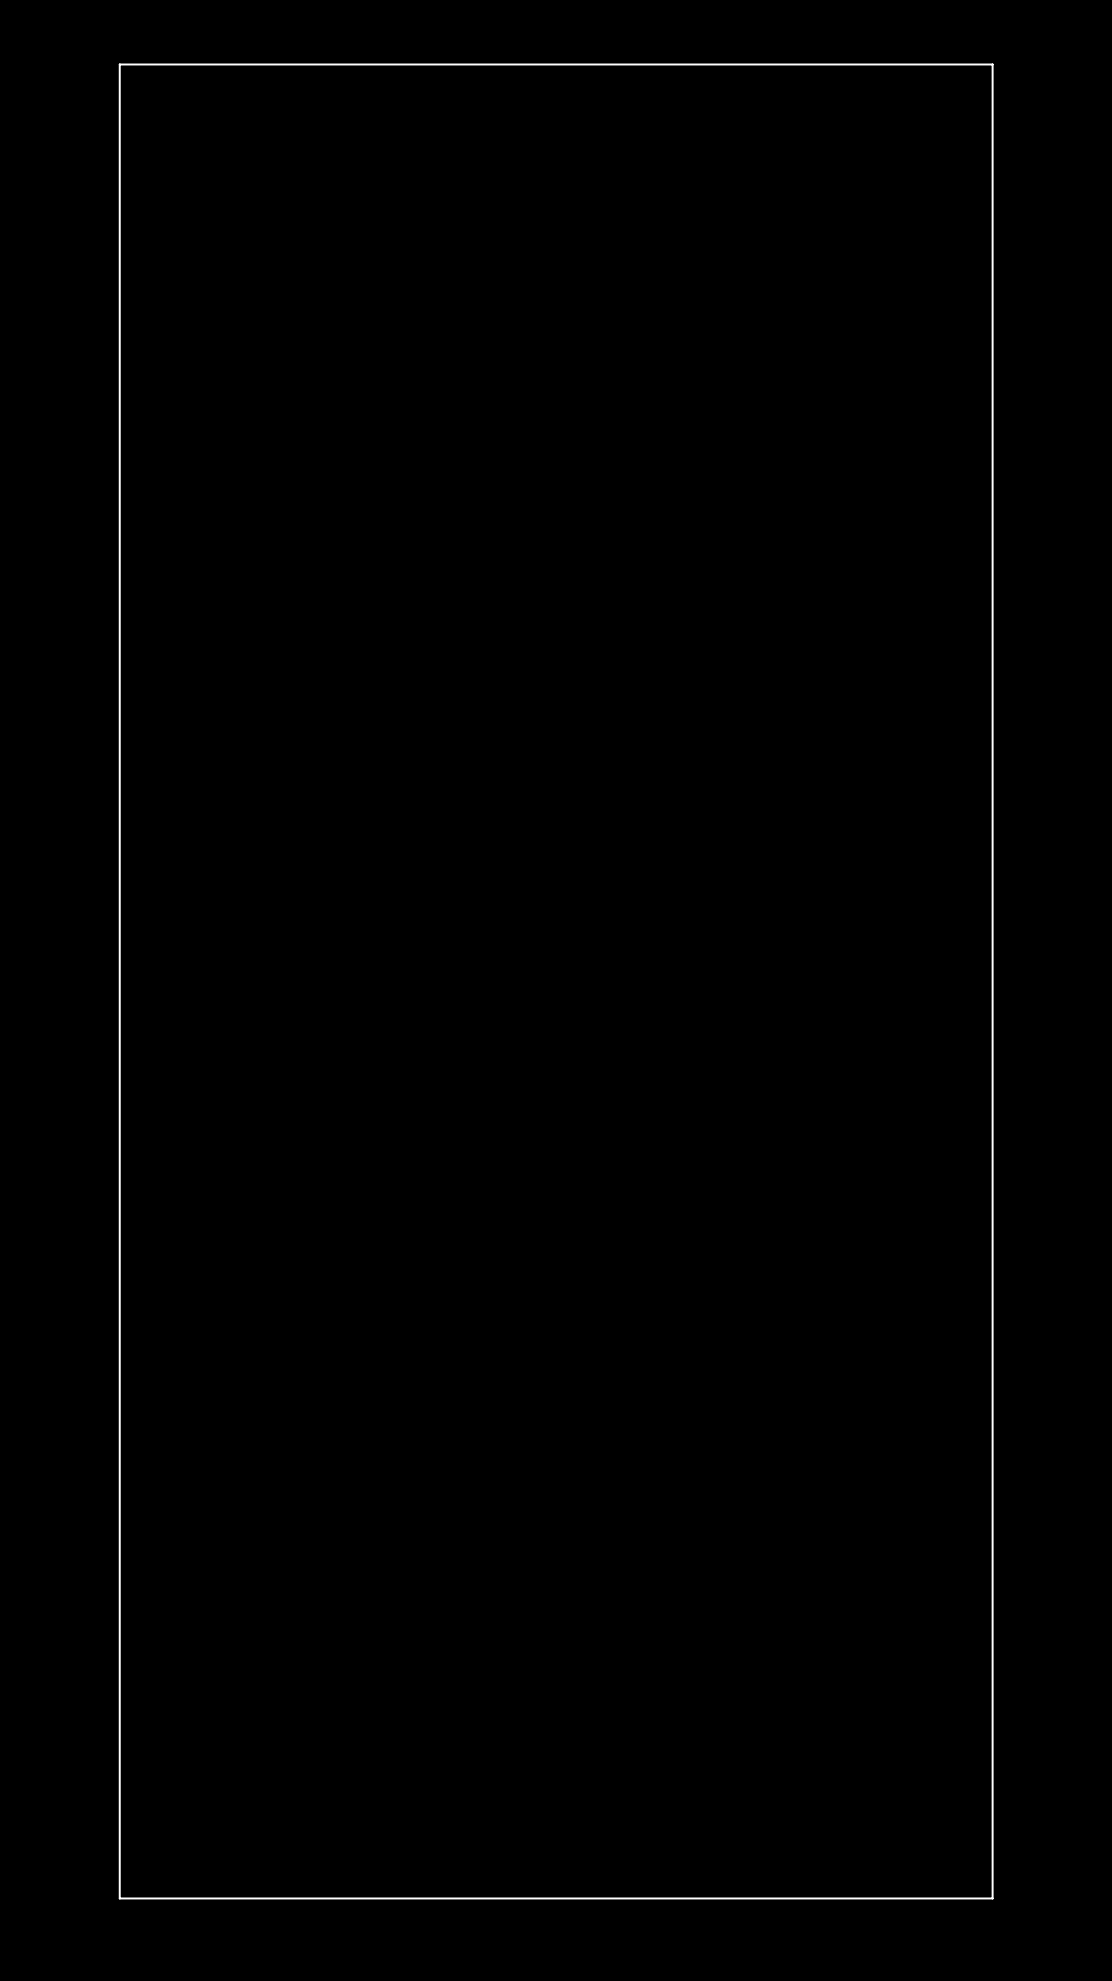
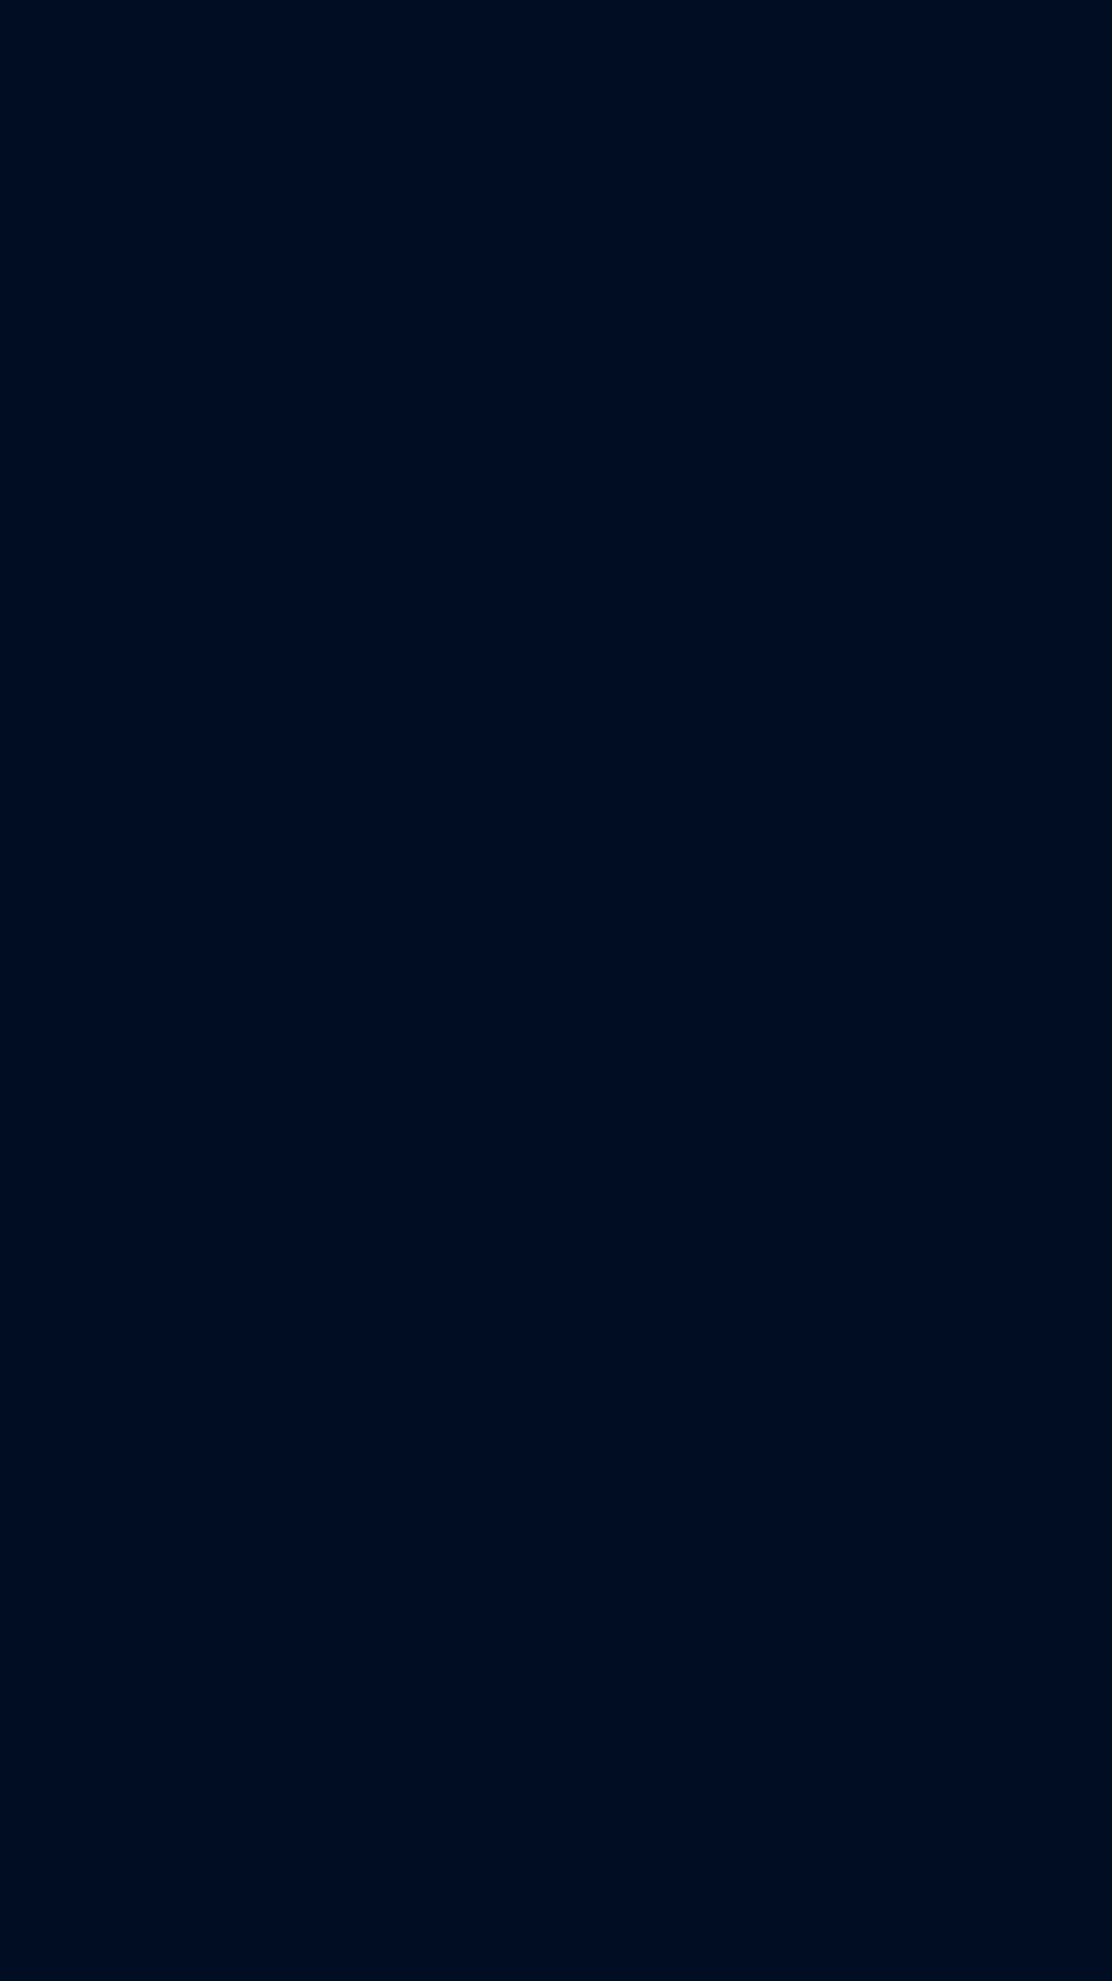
board edge: (119, 64) (992, 64) (992, 1898) (119, 1898) (119, 64) -> none

